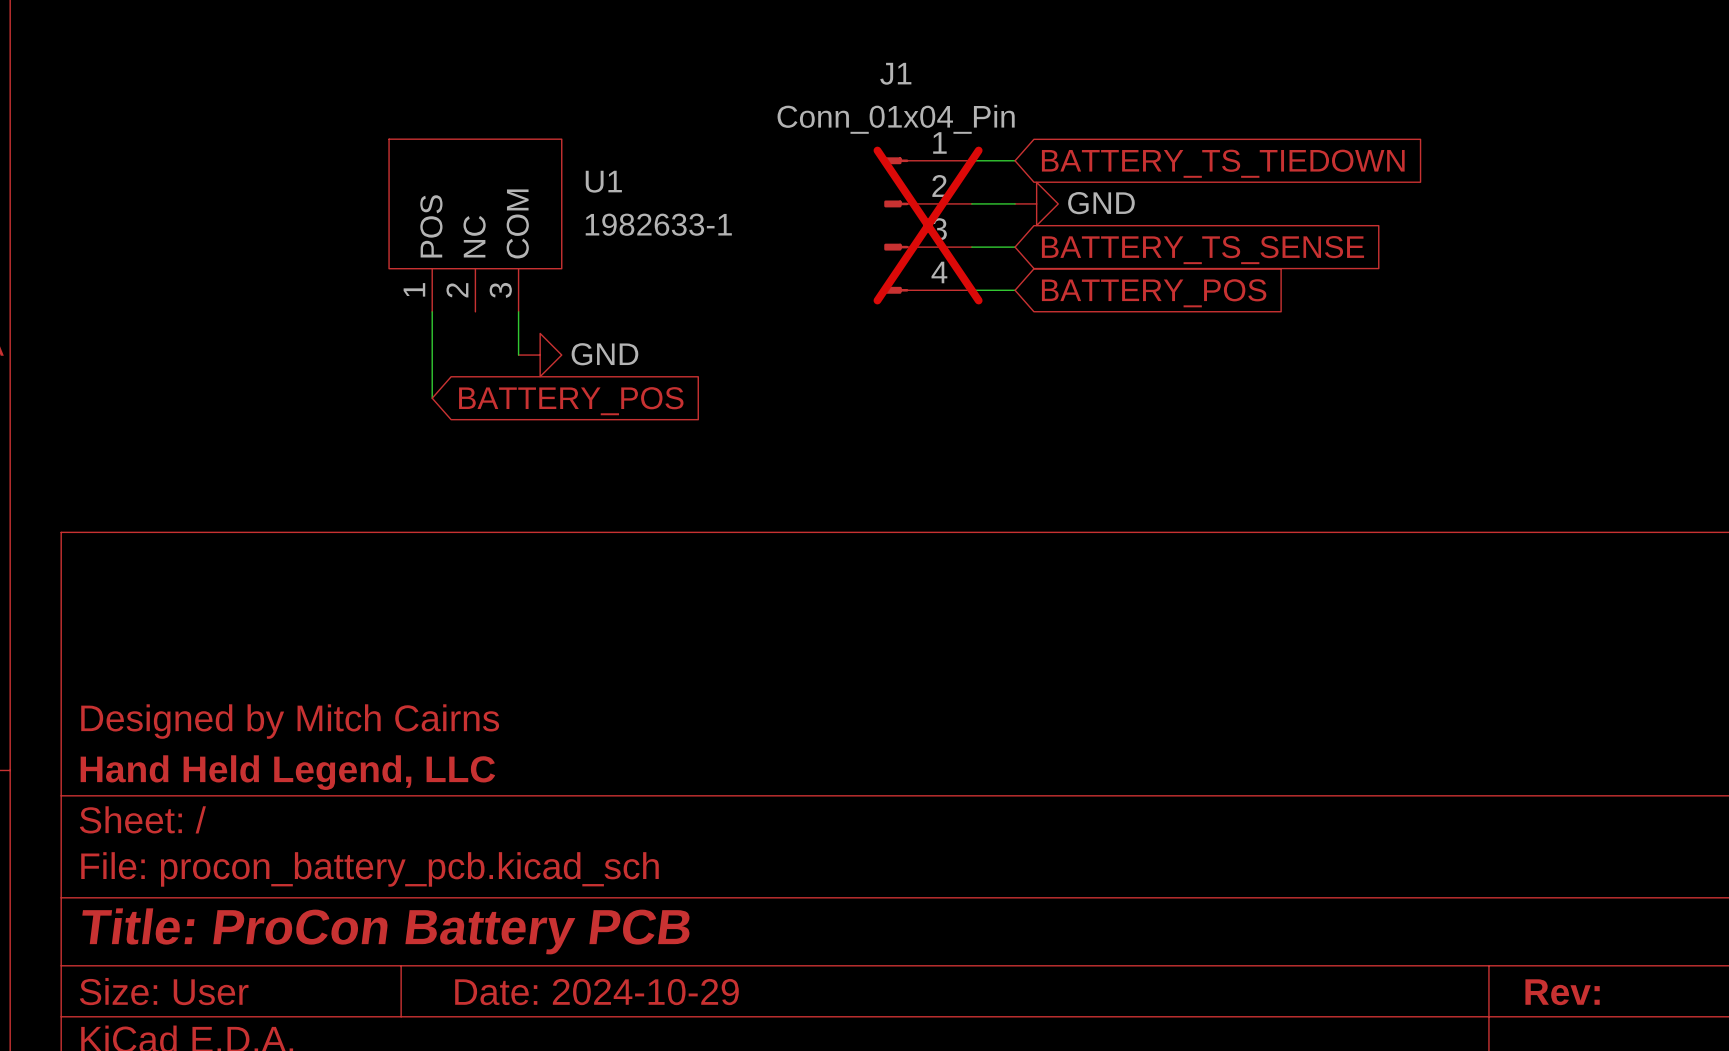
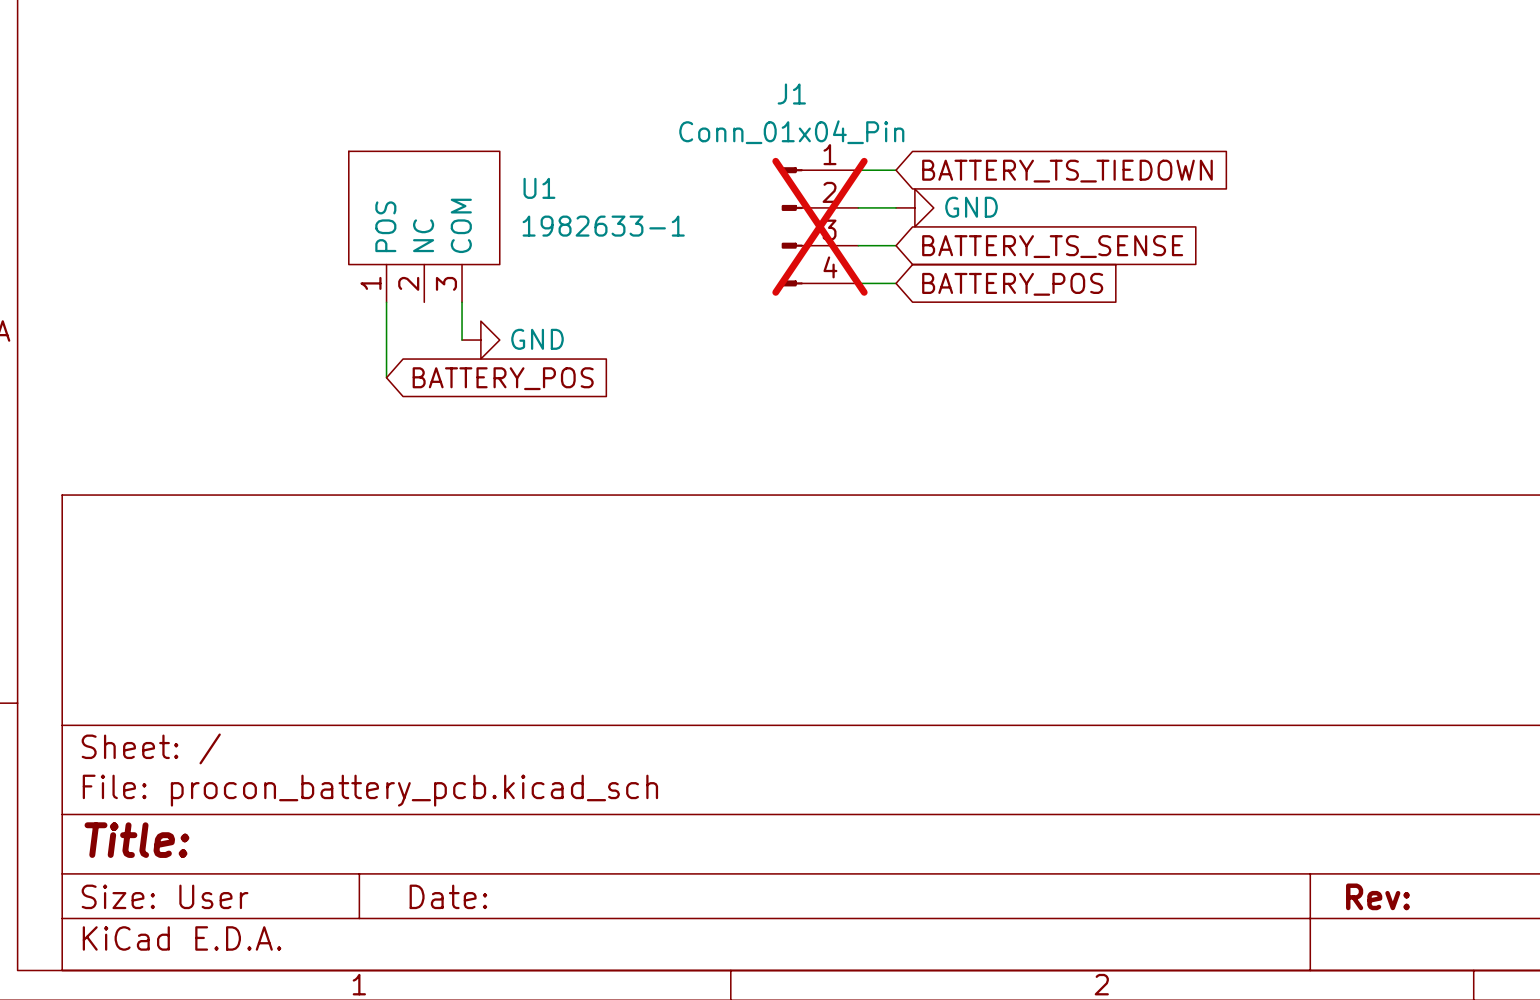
title block: Designed by Mitch Cairns (290, 721) -> none
title block: Hand Held Legend, LLC (287, 772) -> none
title block: Title: ProCon Battery PCB (386, 931) -> Title: (136, 840)
title block: Date: 2024-10-29 (596, 992) -> Date: (448, 896)

